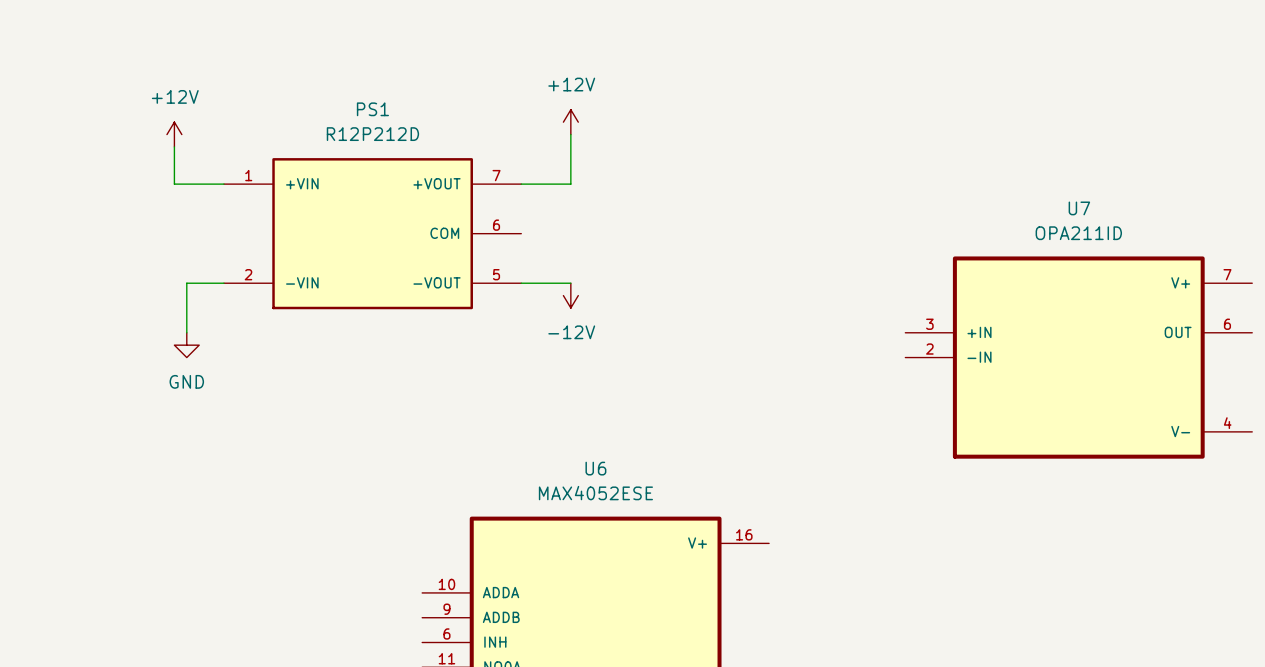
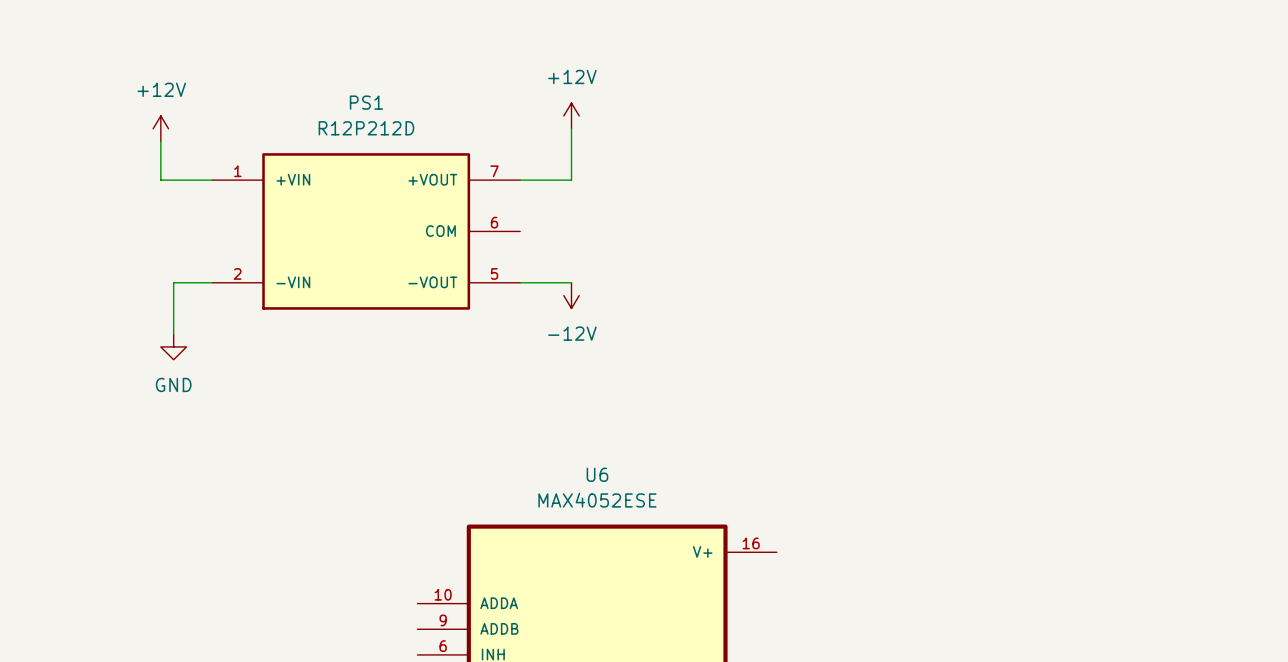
U7: OPA211ID (1078, 357) -> none

